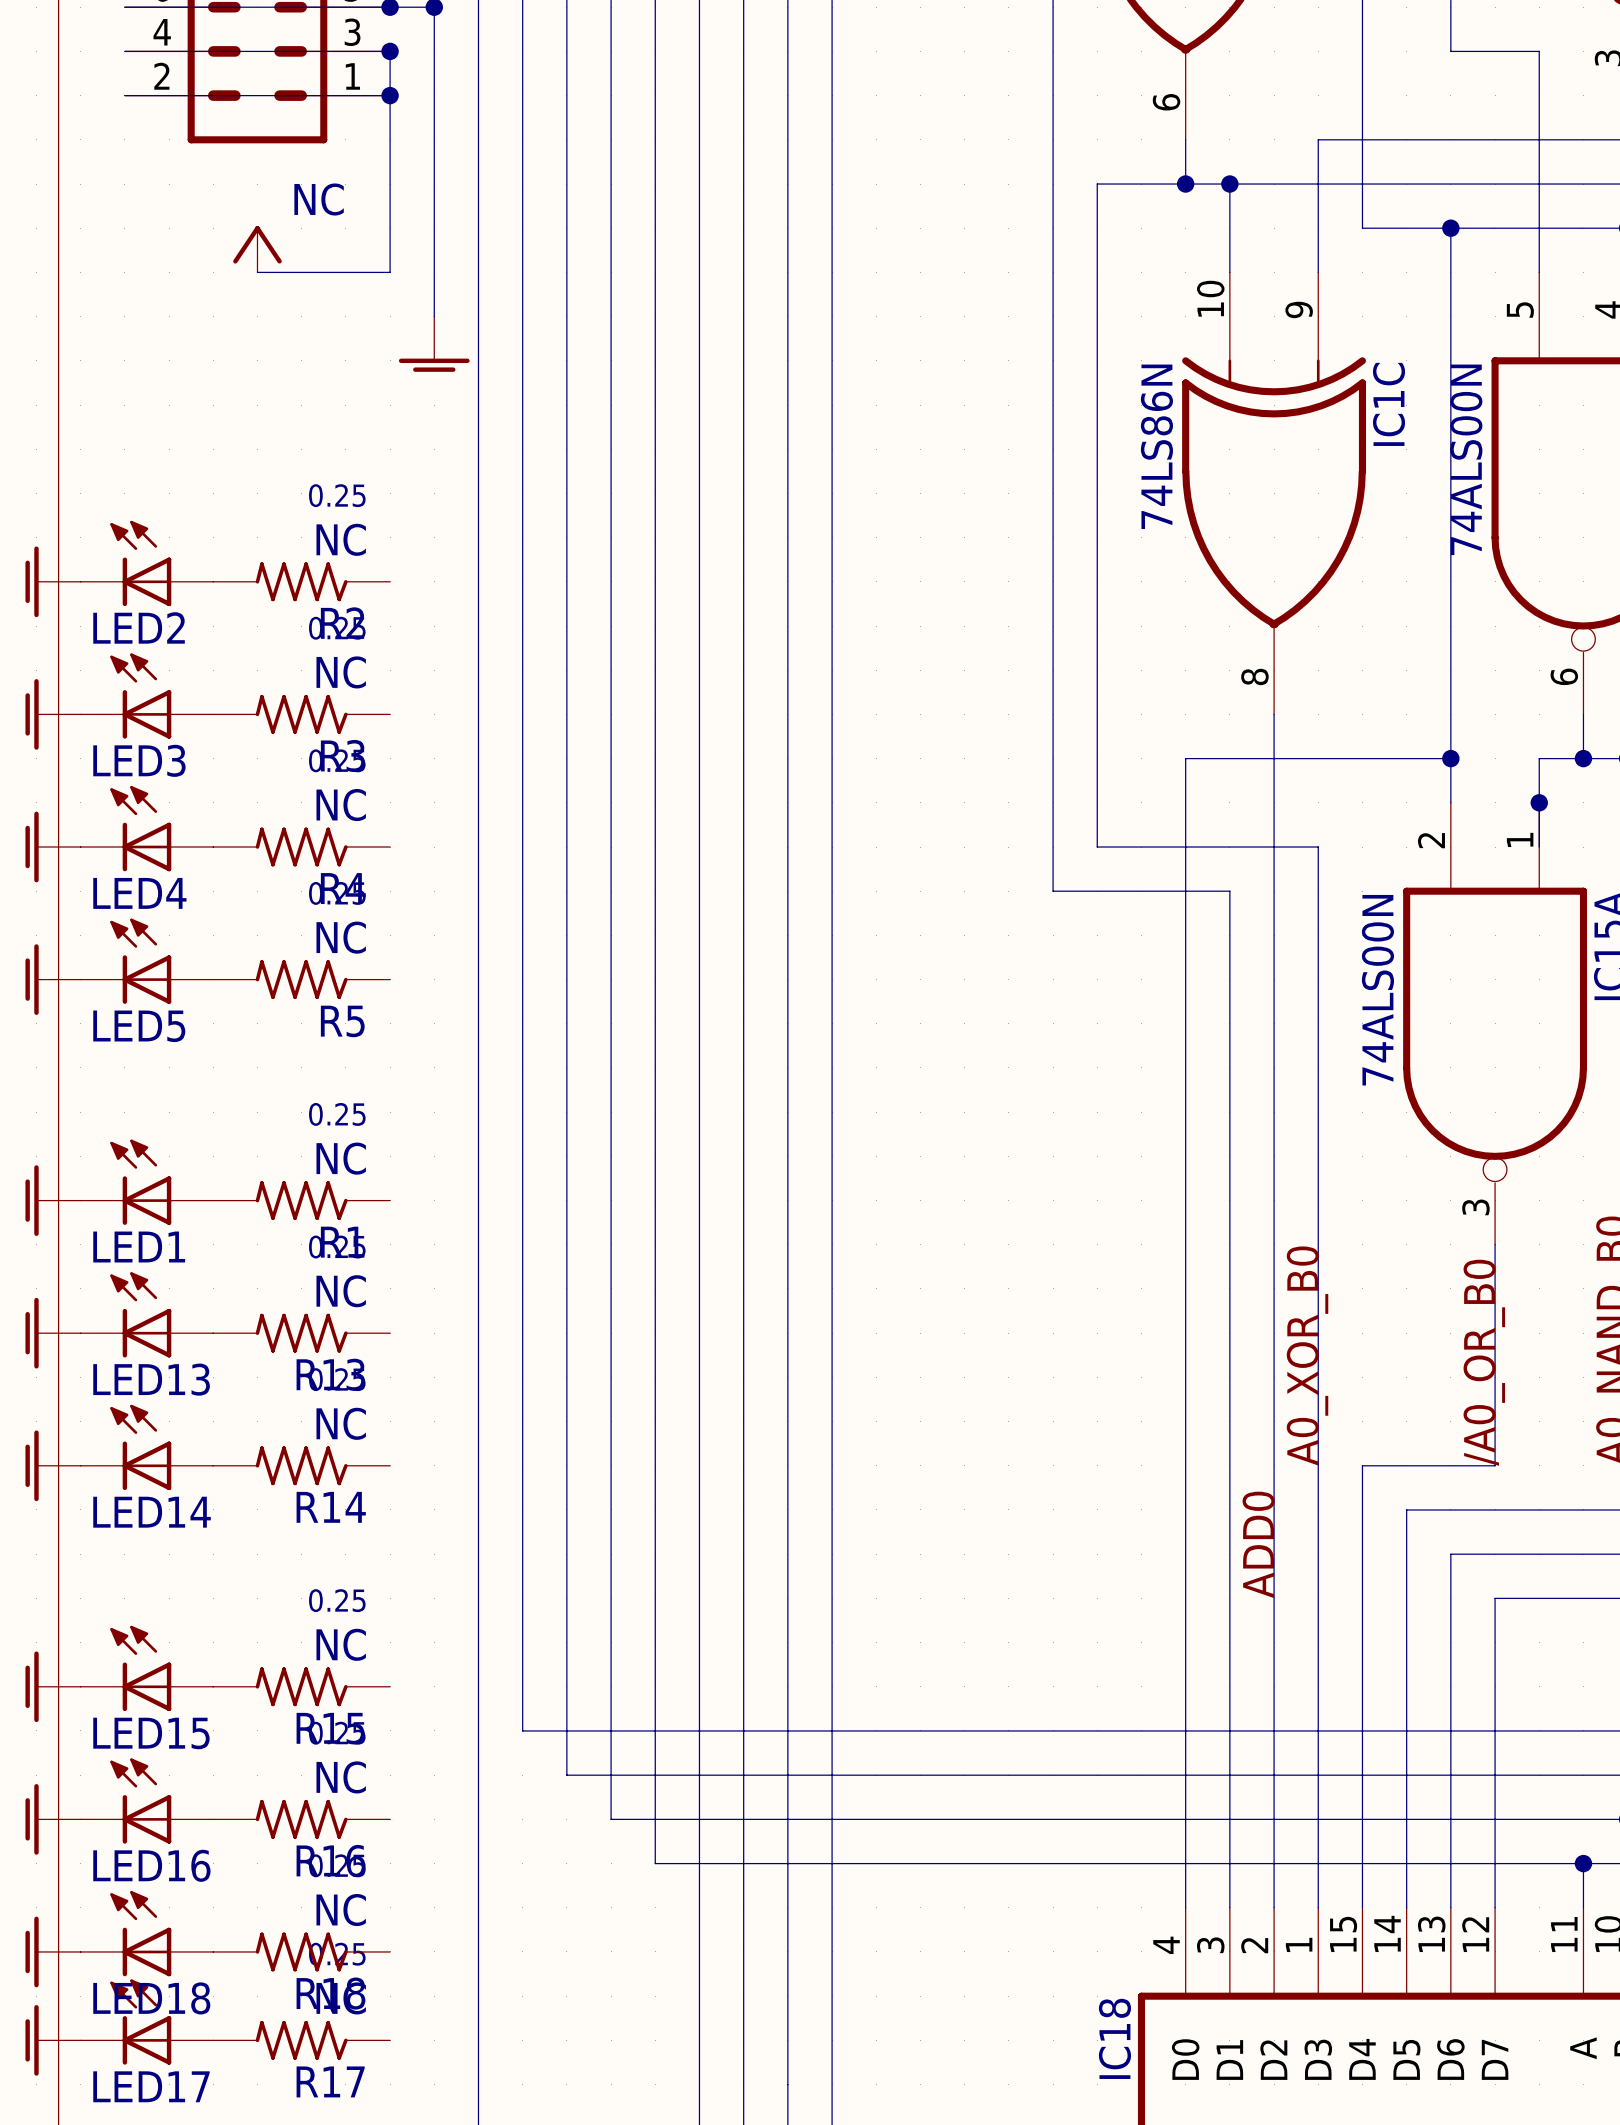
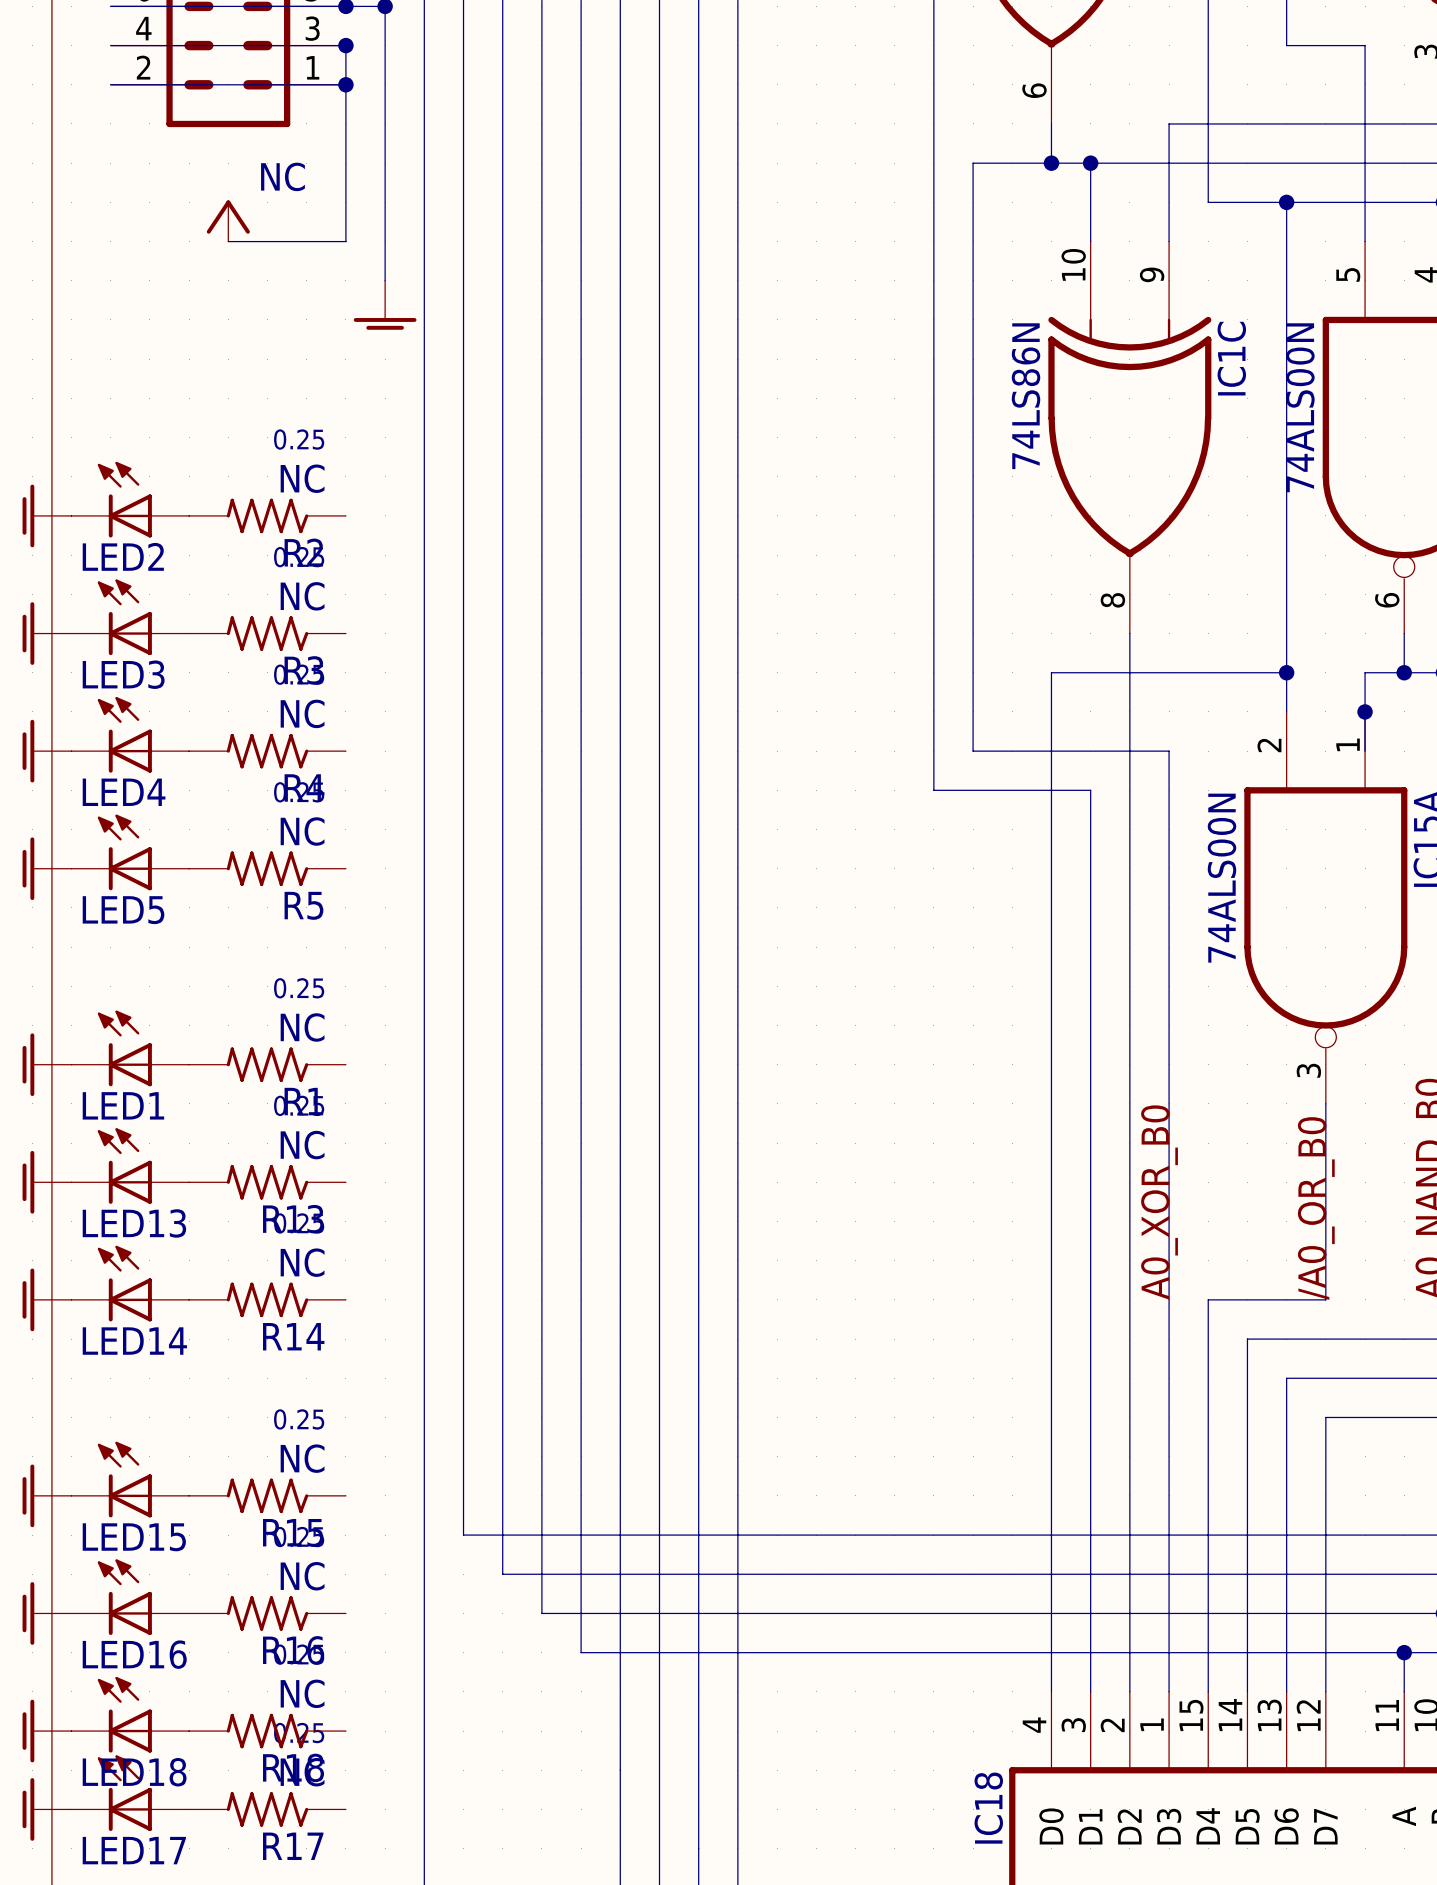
label: ADD0 (1258, 1544) -> none

